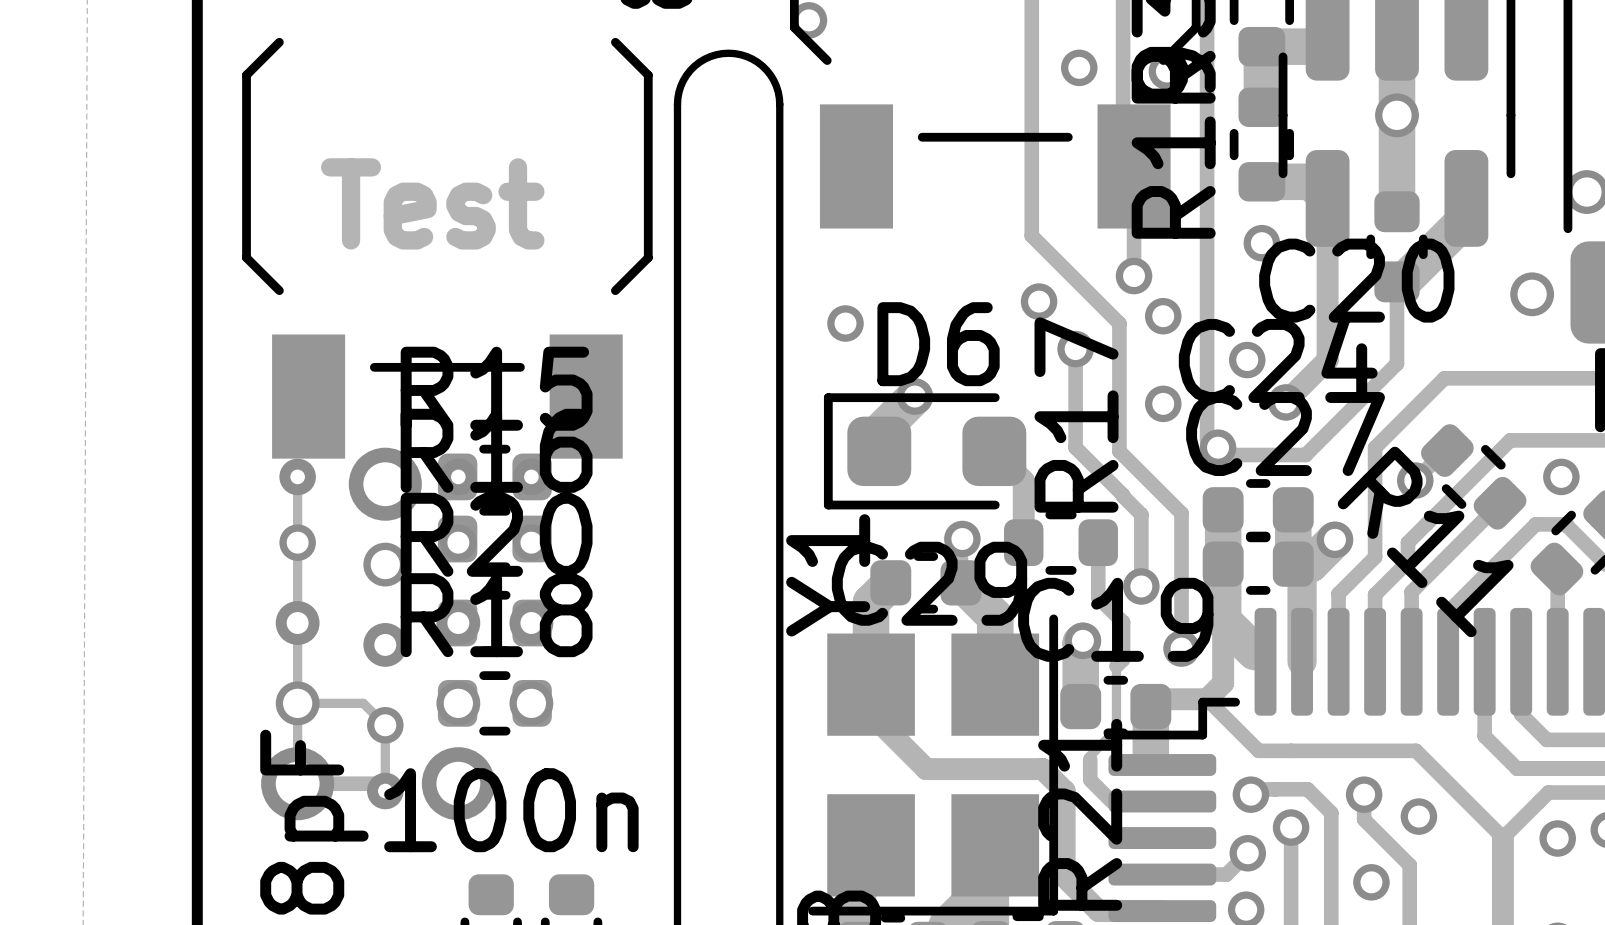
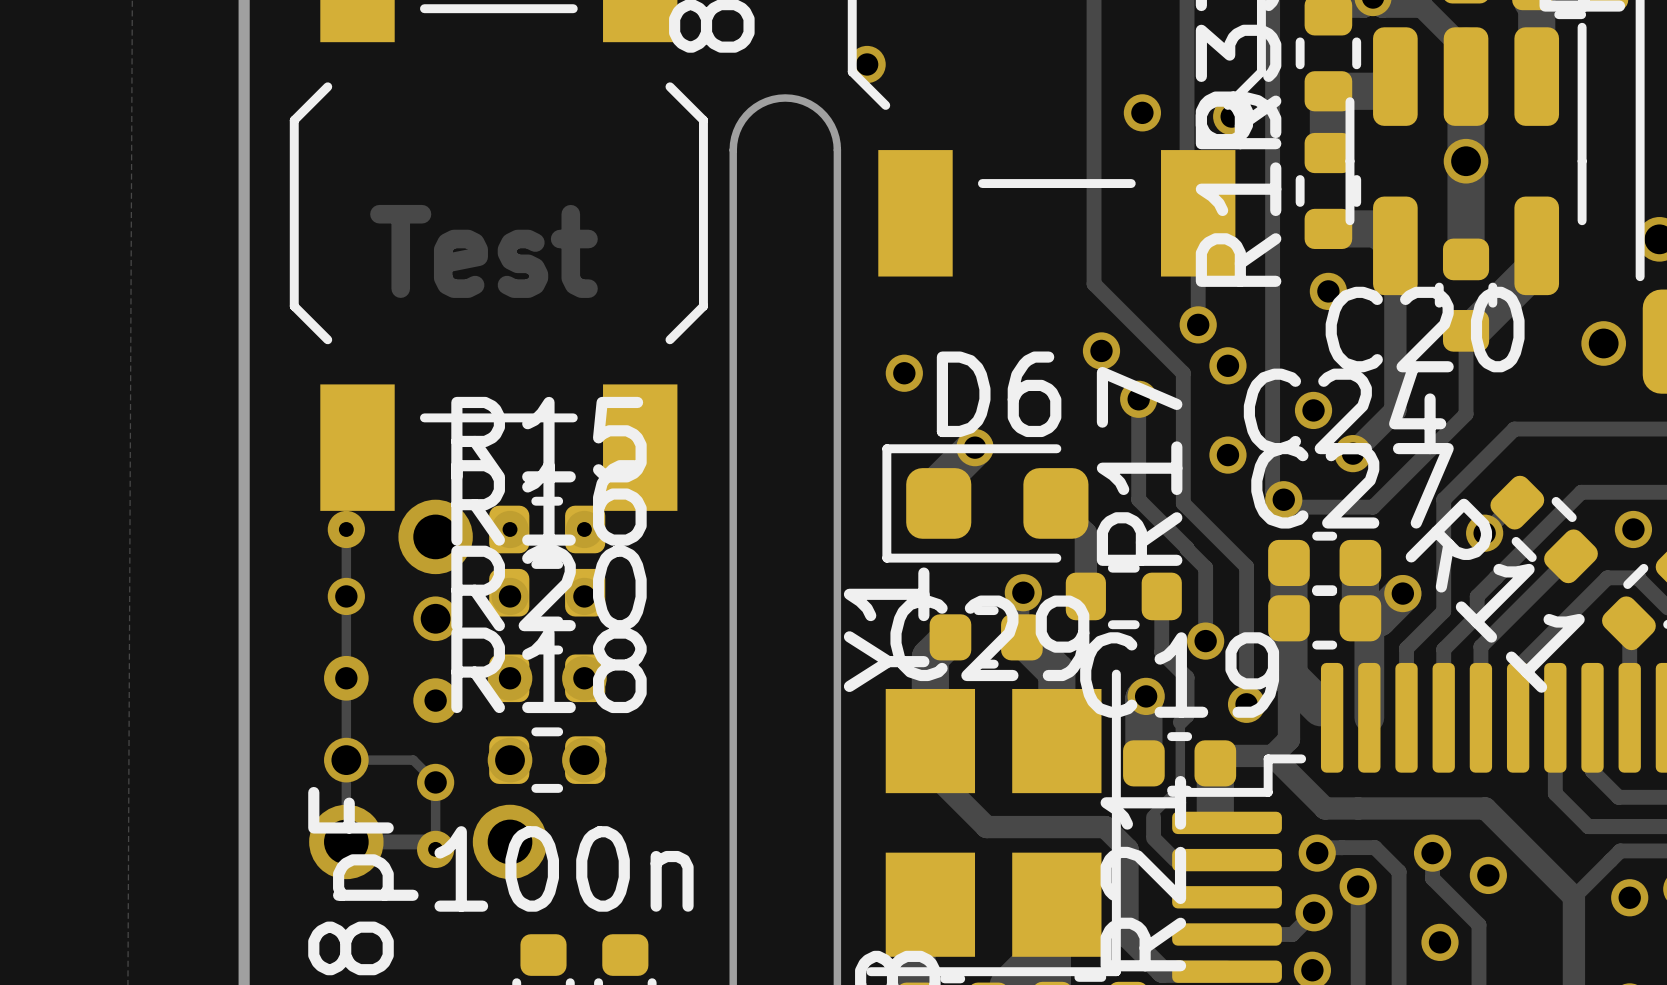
track width: thin (1207, 699) (1258, 750) (1416, 750) (1499, 834) -> thick (1272, 755) (1325, 808) (1485, 808) (1570, 893)

